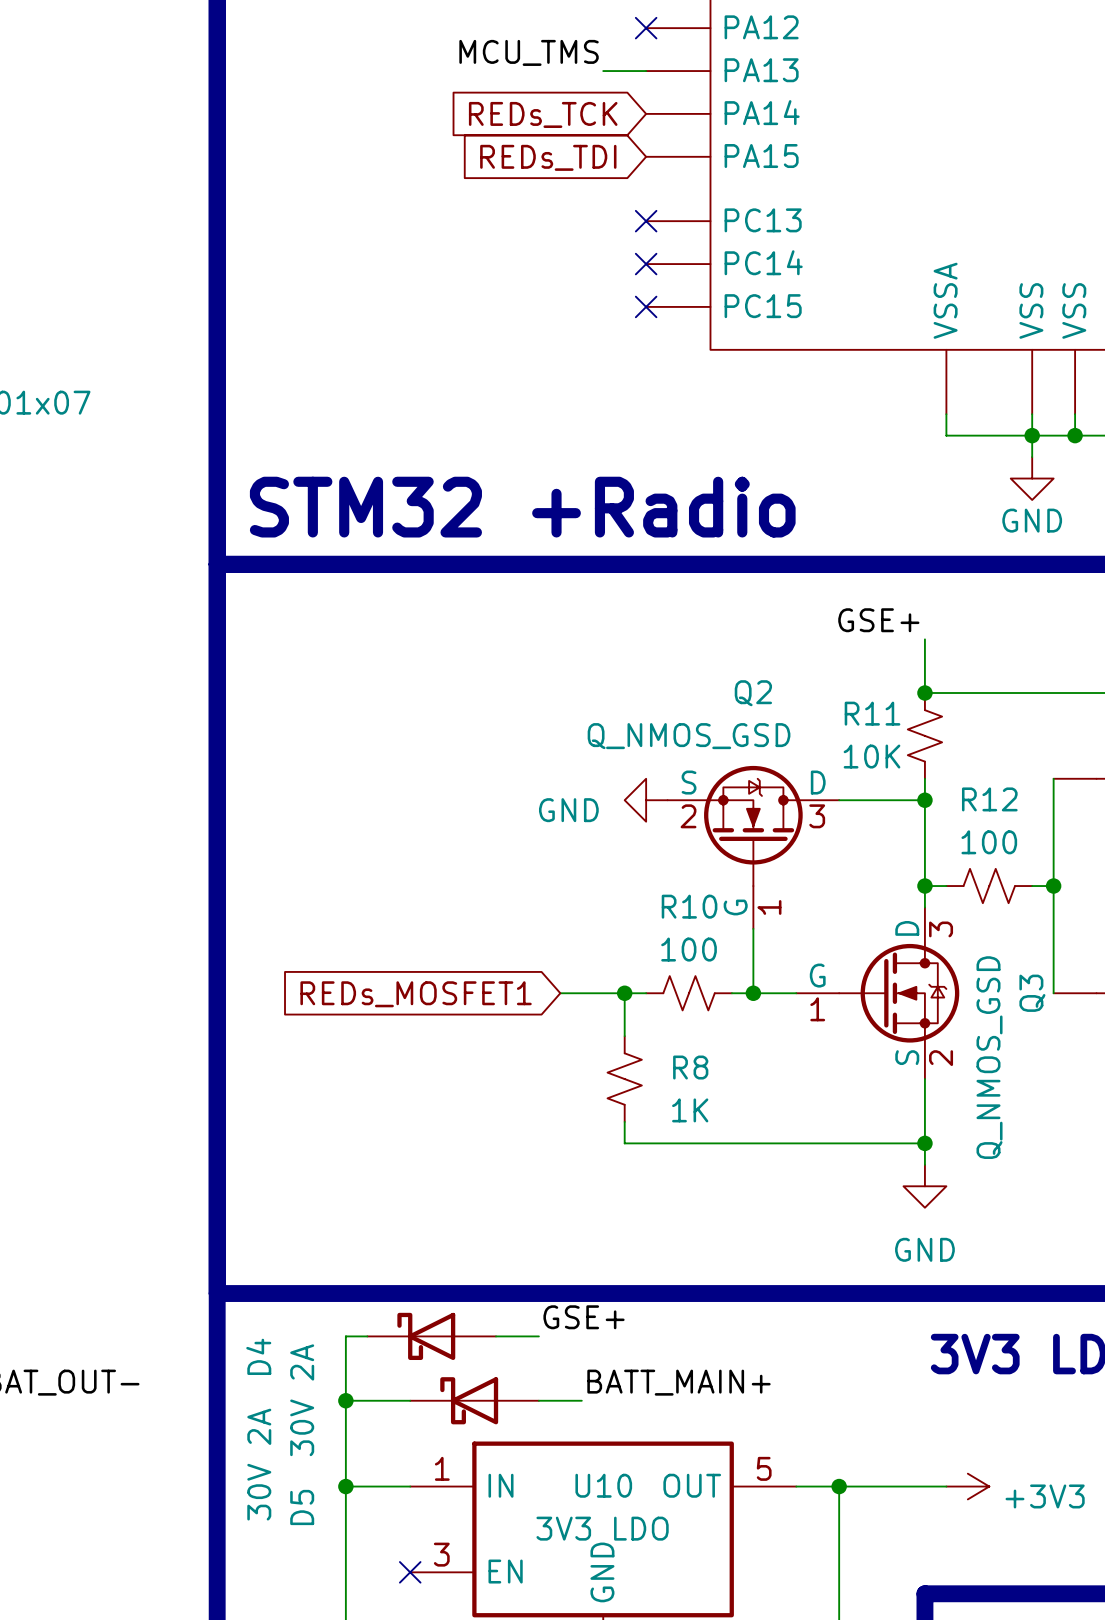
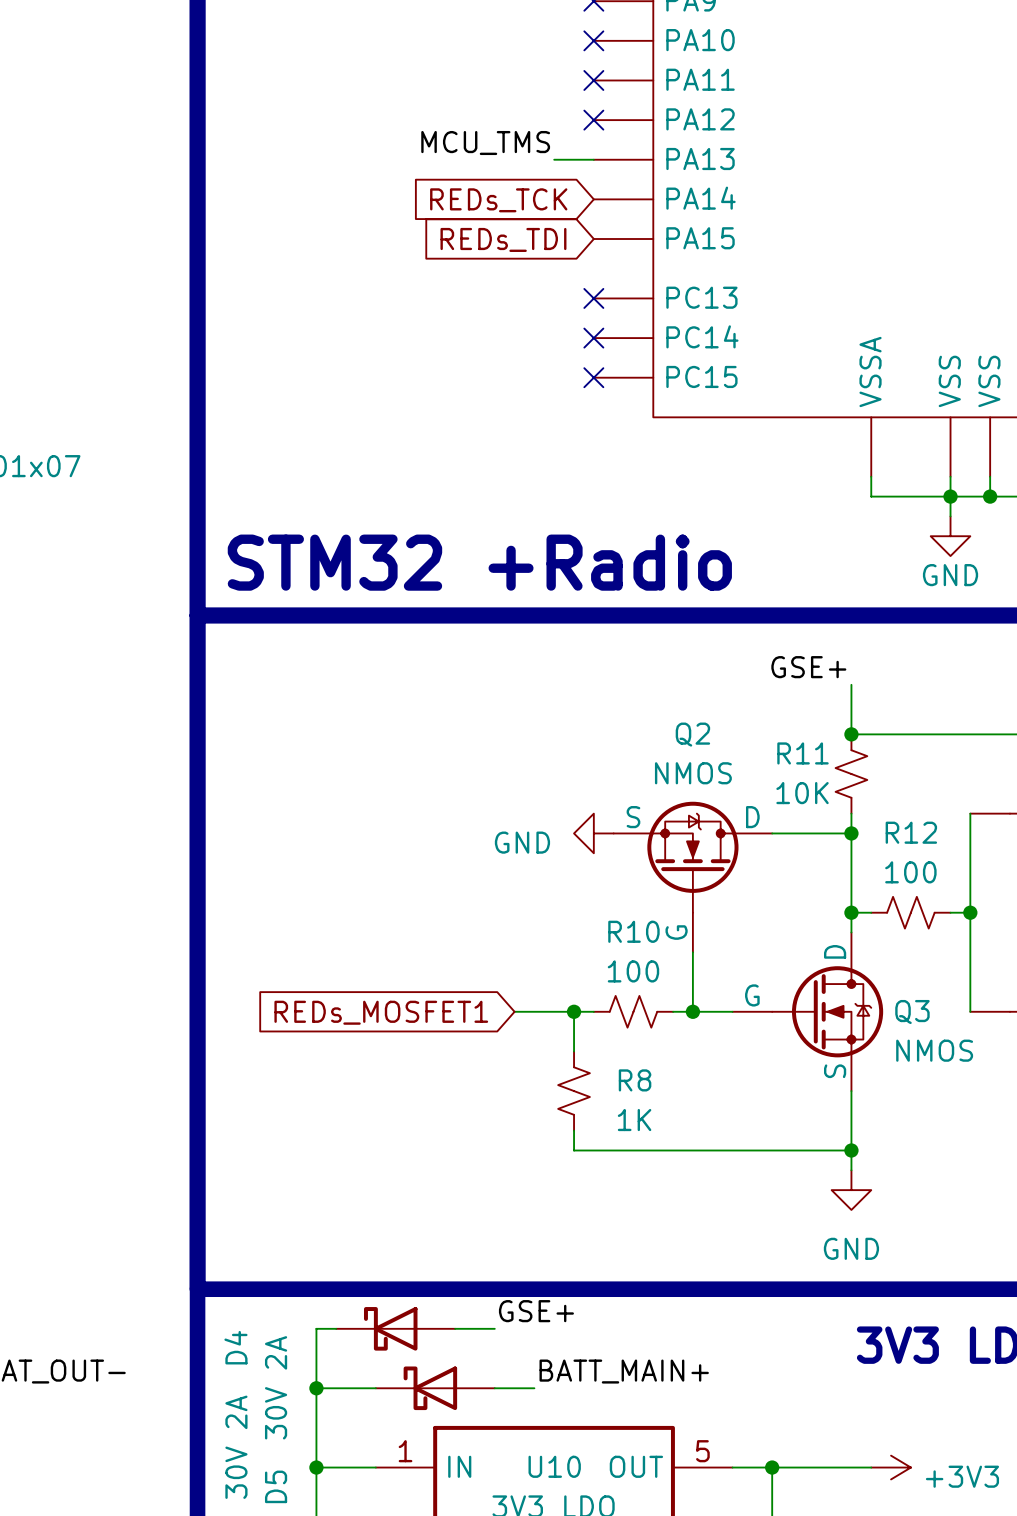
Q2 value: Q_NMOS_GSD (689, 736) -> NMOS (693, 773)
Q2 pin number: 2 (688, 816) -> none
Q2 pin number: 3 (817, 816) -> none
Q2 pin number: 1 (769, 907) -> none
Q3 pin number: 3 (941, 929) -> none
Q3 name rotation: 0° (1032, 993) -> 90° clockwise (912, 1011)
Q3 pin number: 1 (817, 1009) -> none
Q3 value: Q_NMOS_GSD (989, 1057) -> NMOS (934, 1050)
Q3 pin number: 2 (941, 1058) -> none

